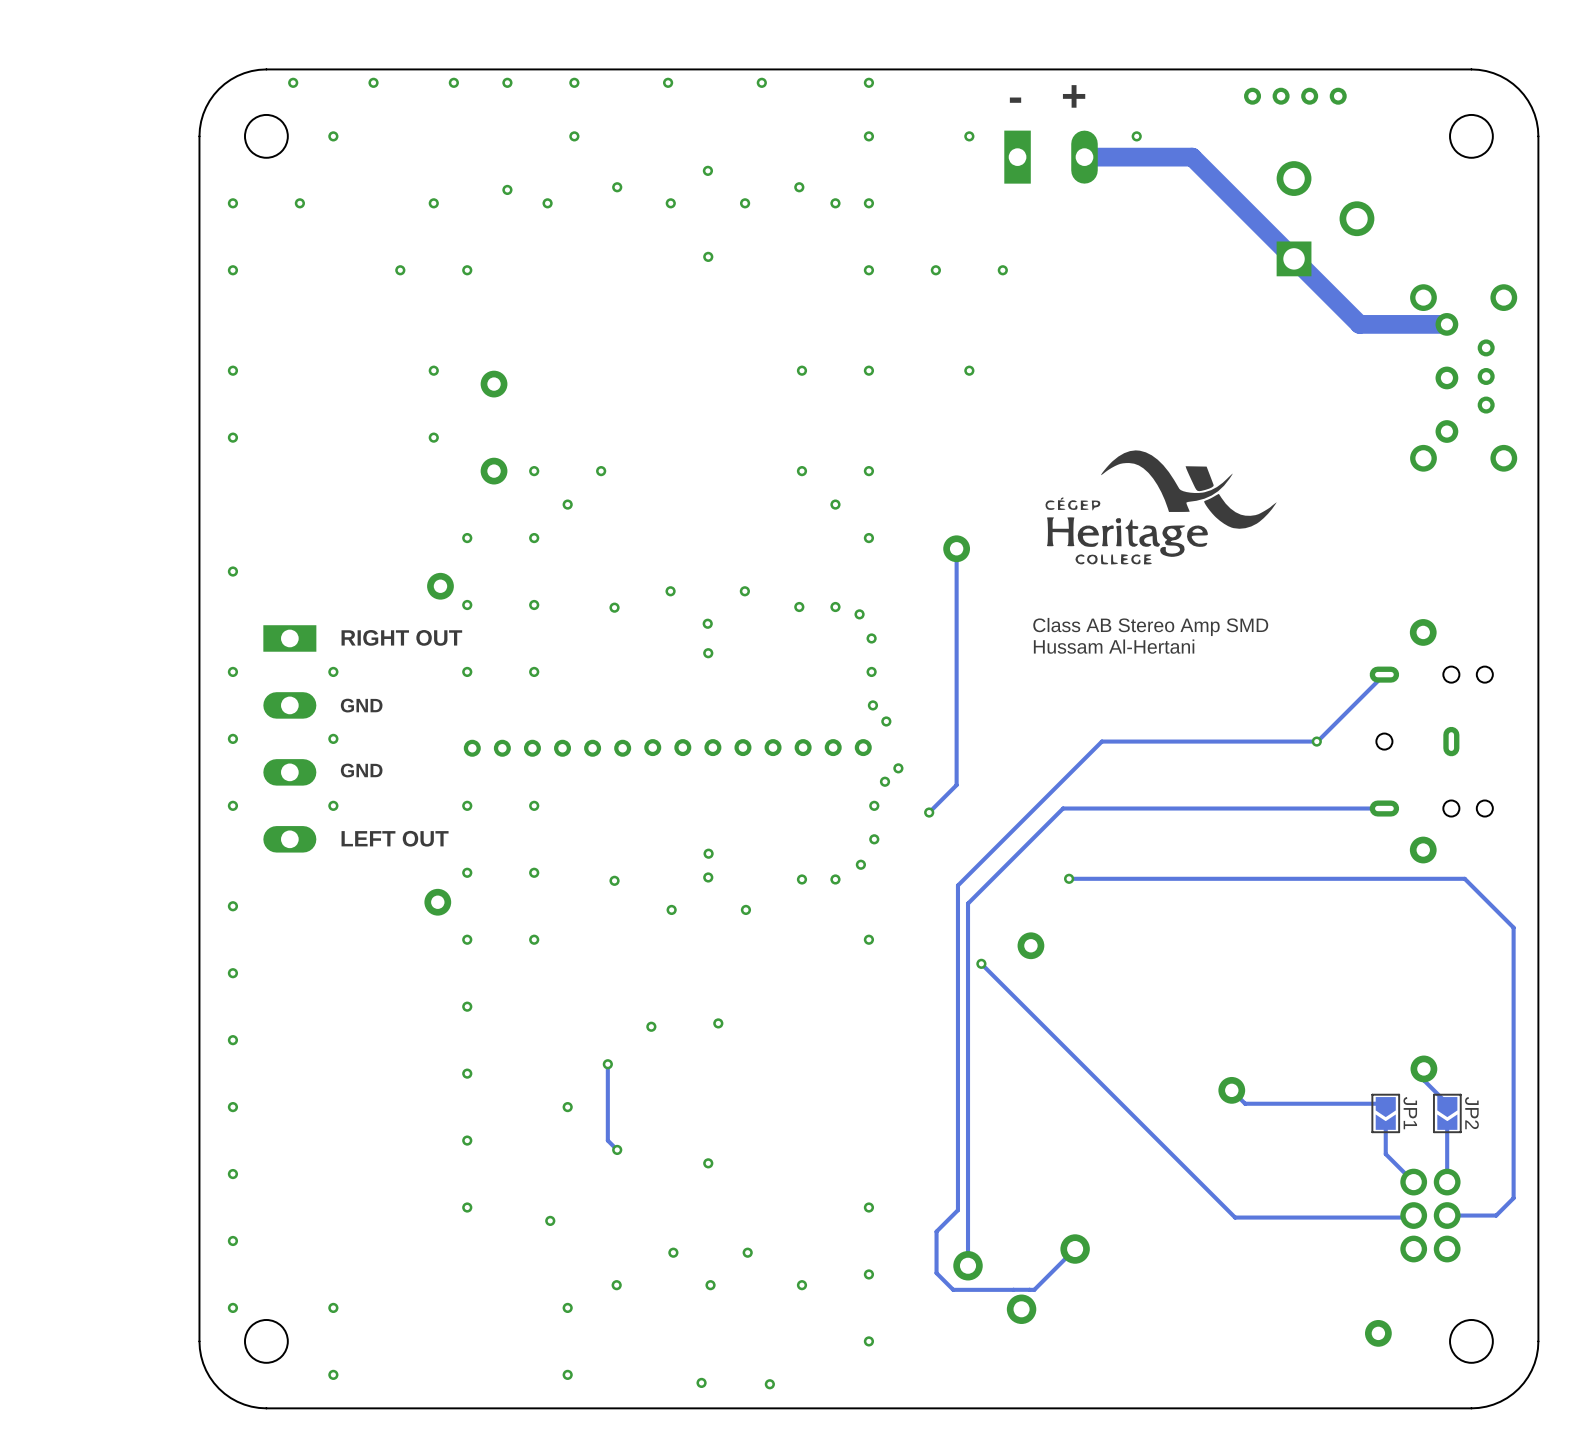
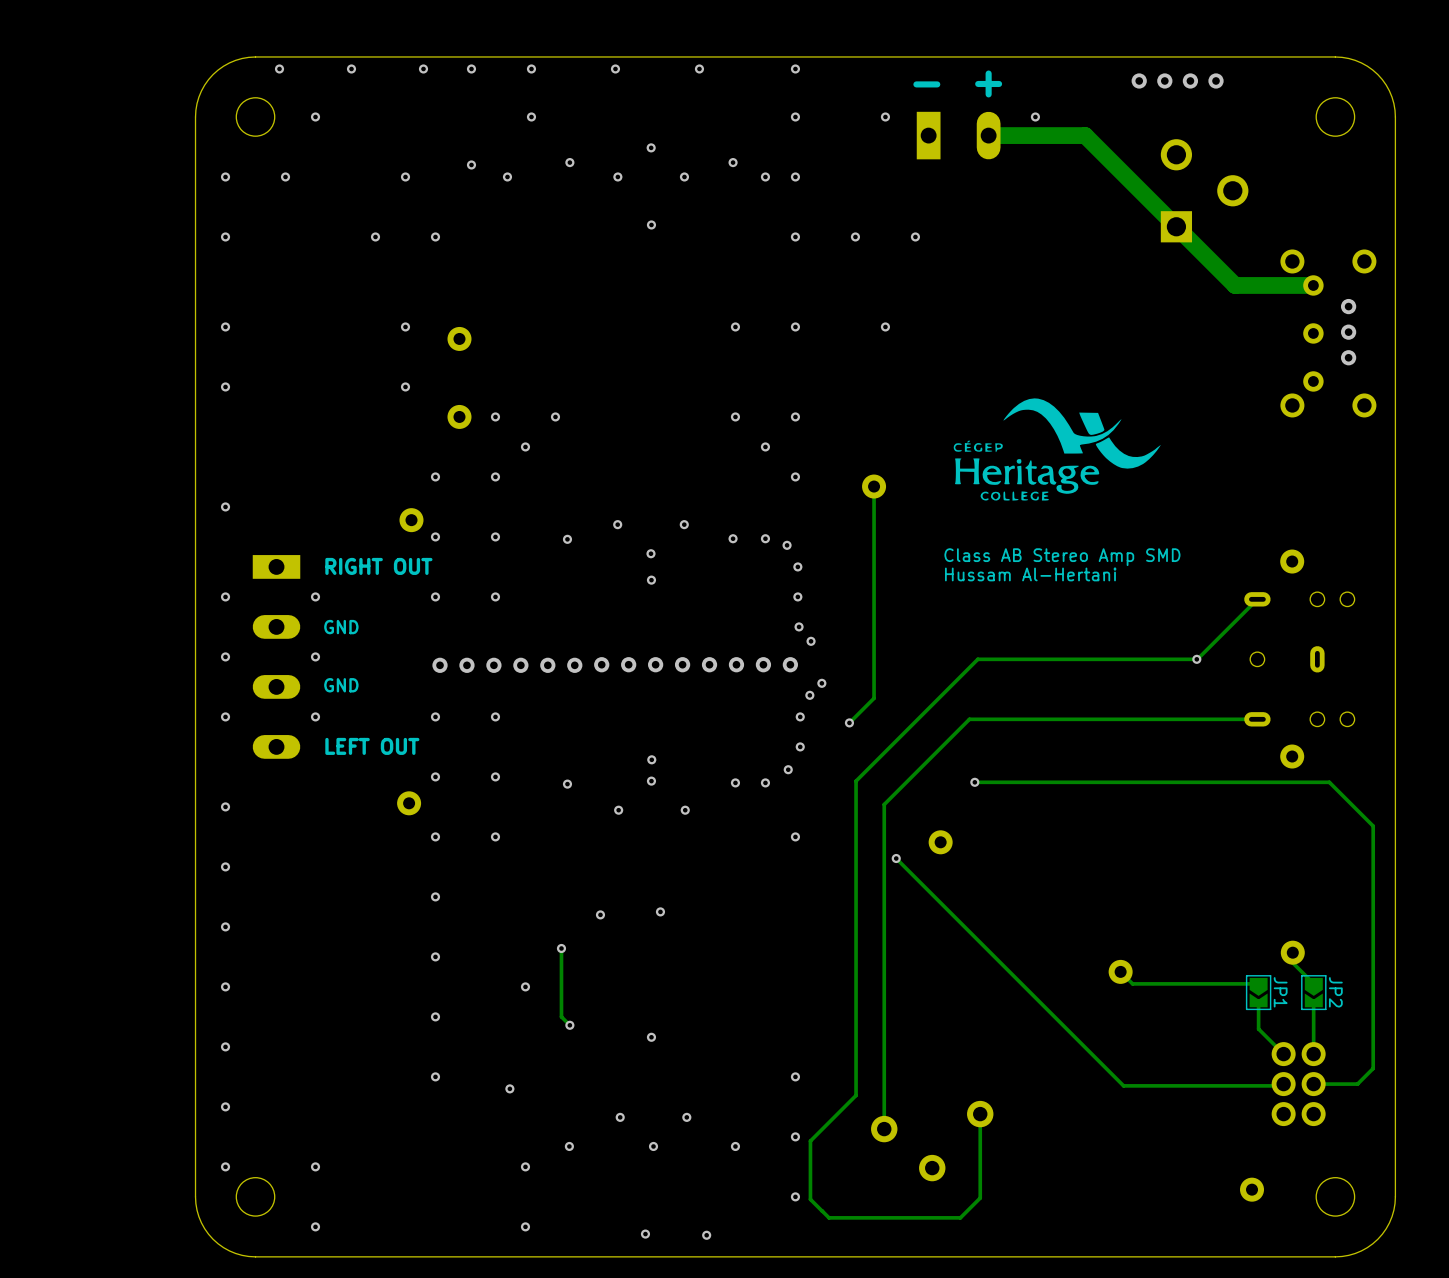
track: (1101, 741) (957, 885) (957, 1210) (936, 1231) (936, 1273) (953, 1289) (1034, 1289) (1075, 1249) -> (1004, 659) (977, 659) (856, 781) (856, 1095) (810, 1141) (810, 1199) (822, 1211)
track: none -> (980, 1114) (980, 1198) (960, 1217) (829, 1217) (822, 1211)

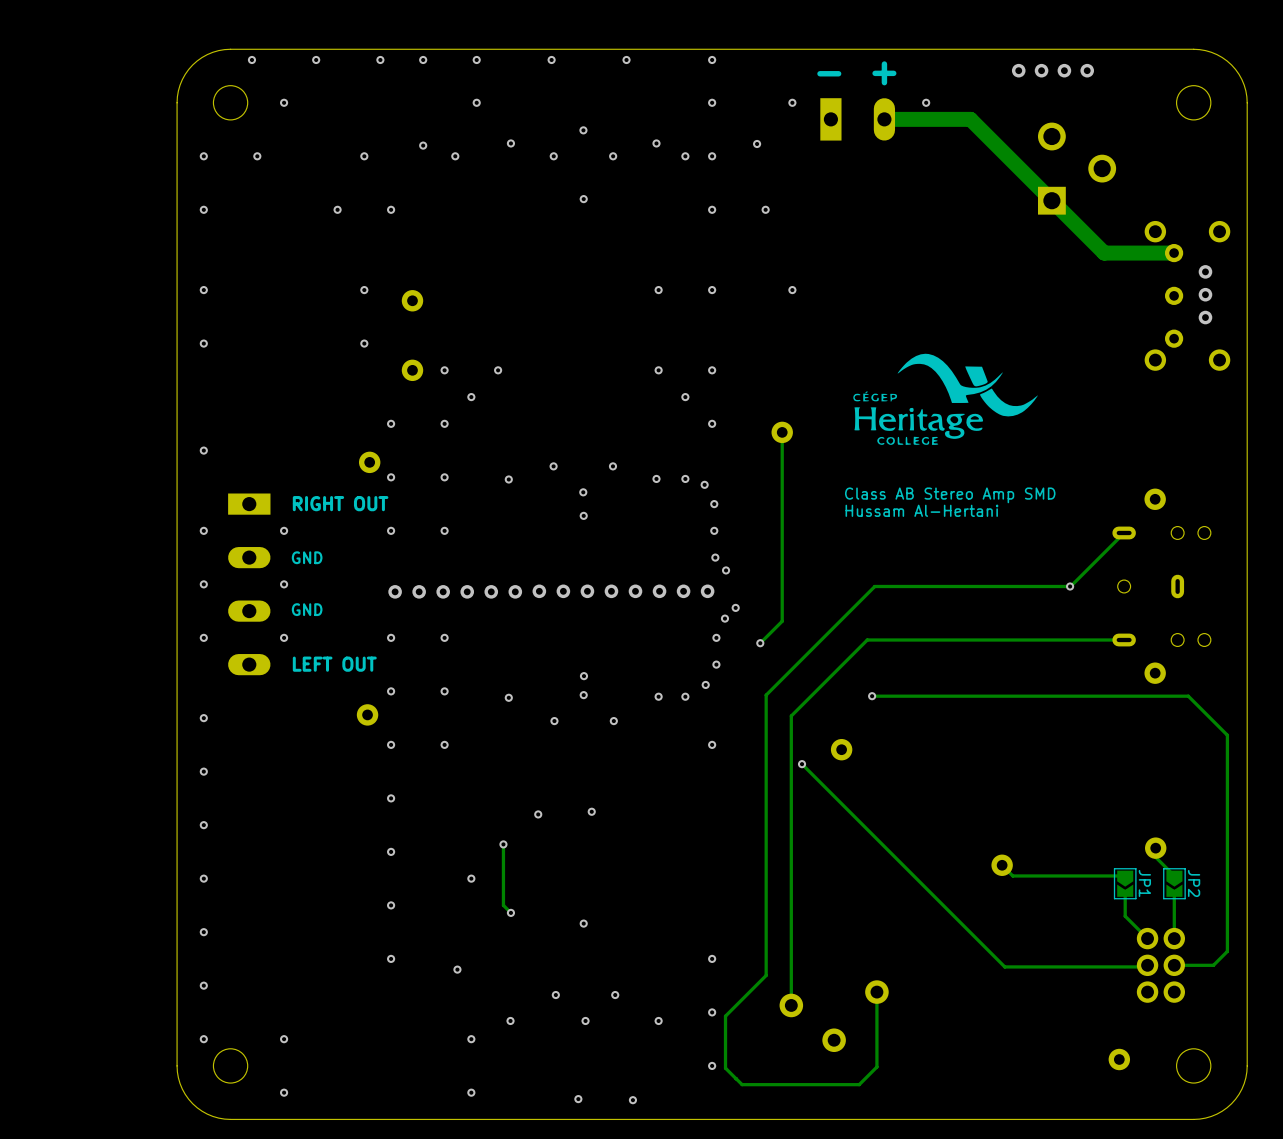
via: none -> (757, 143)
via: (915, 236) -> none

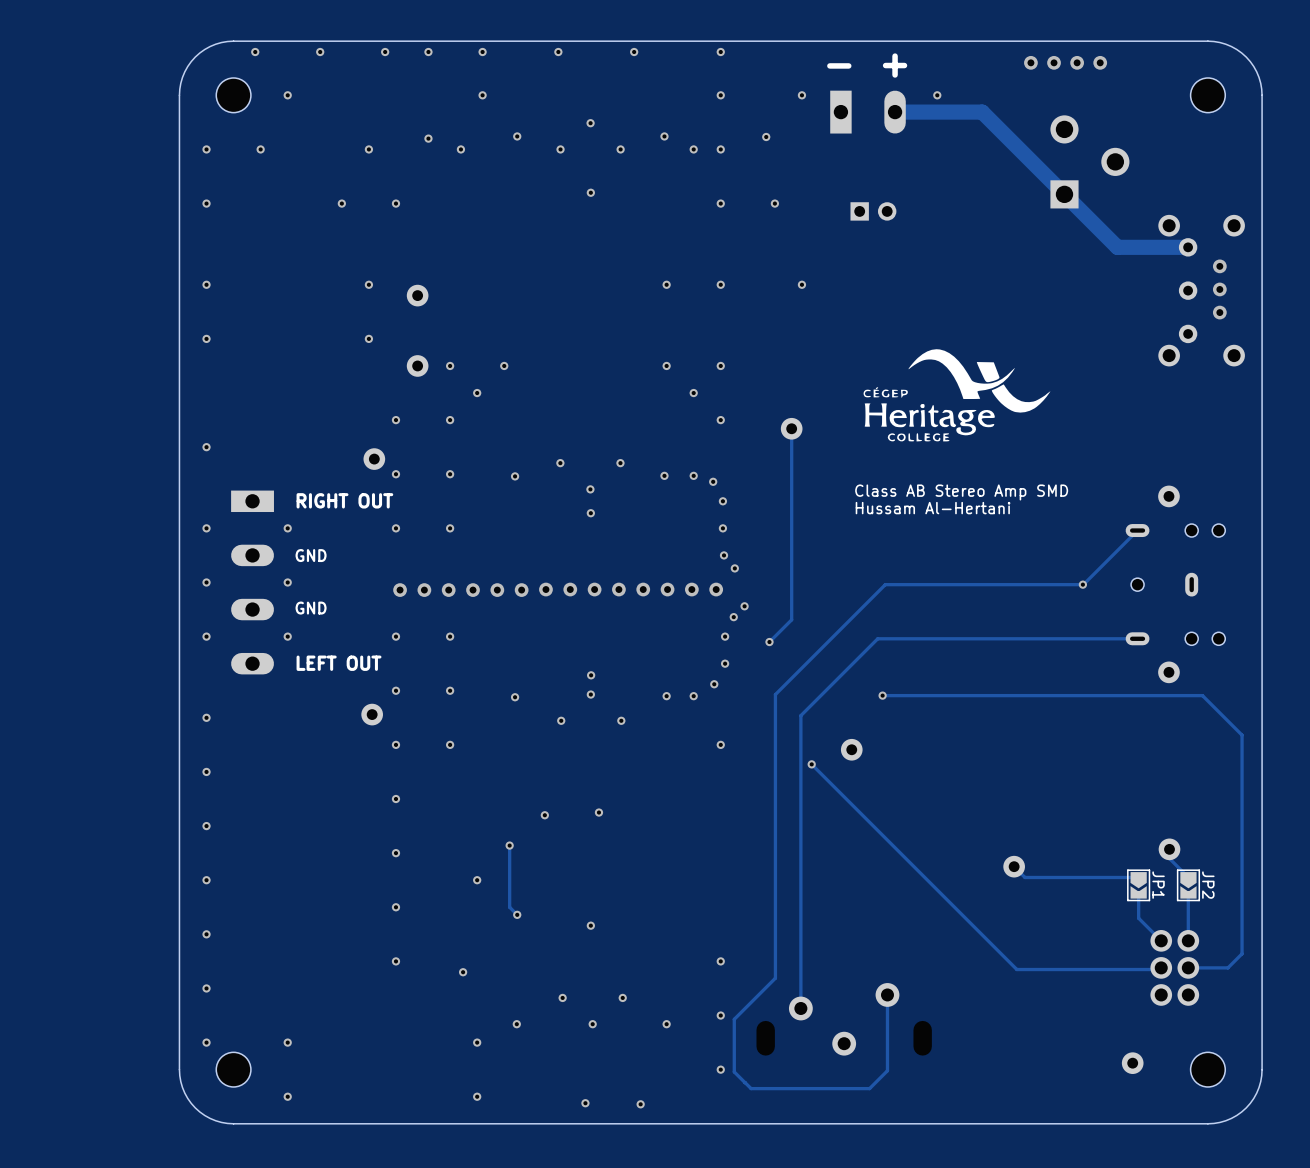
part: none -> (873, 211)

